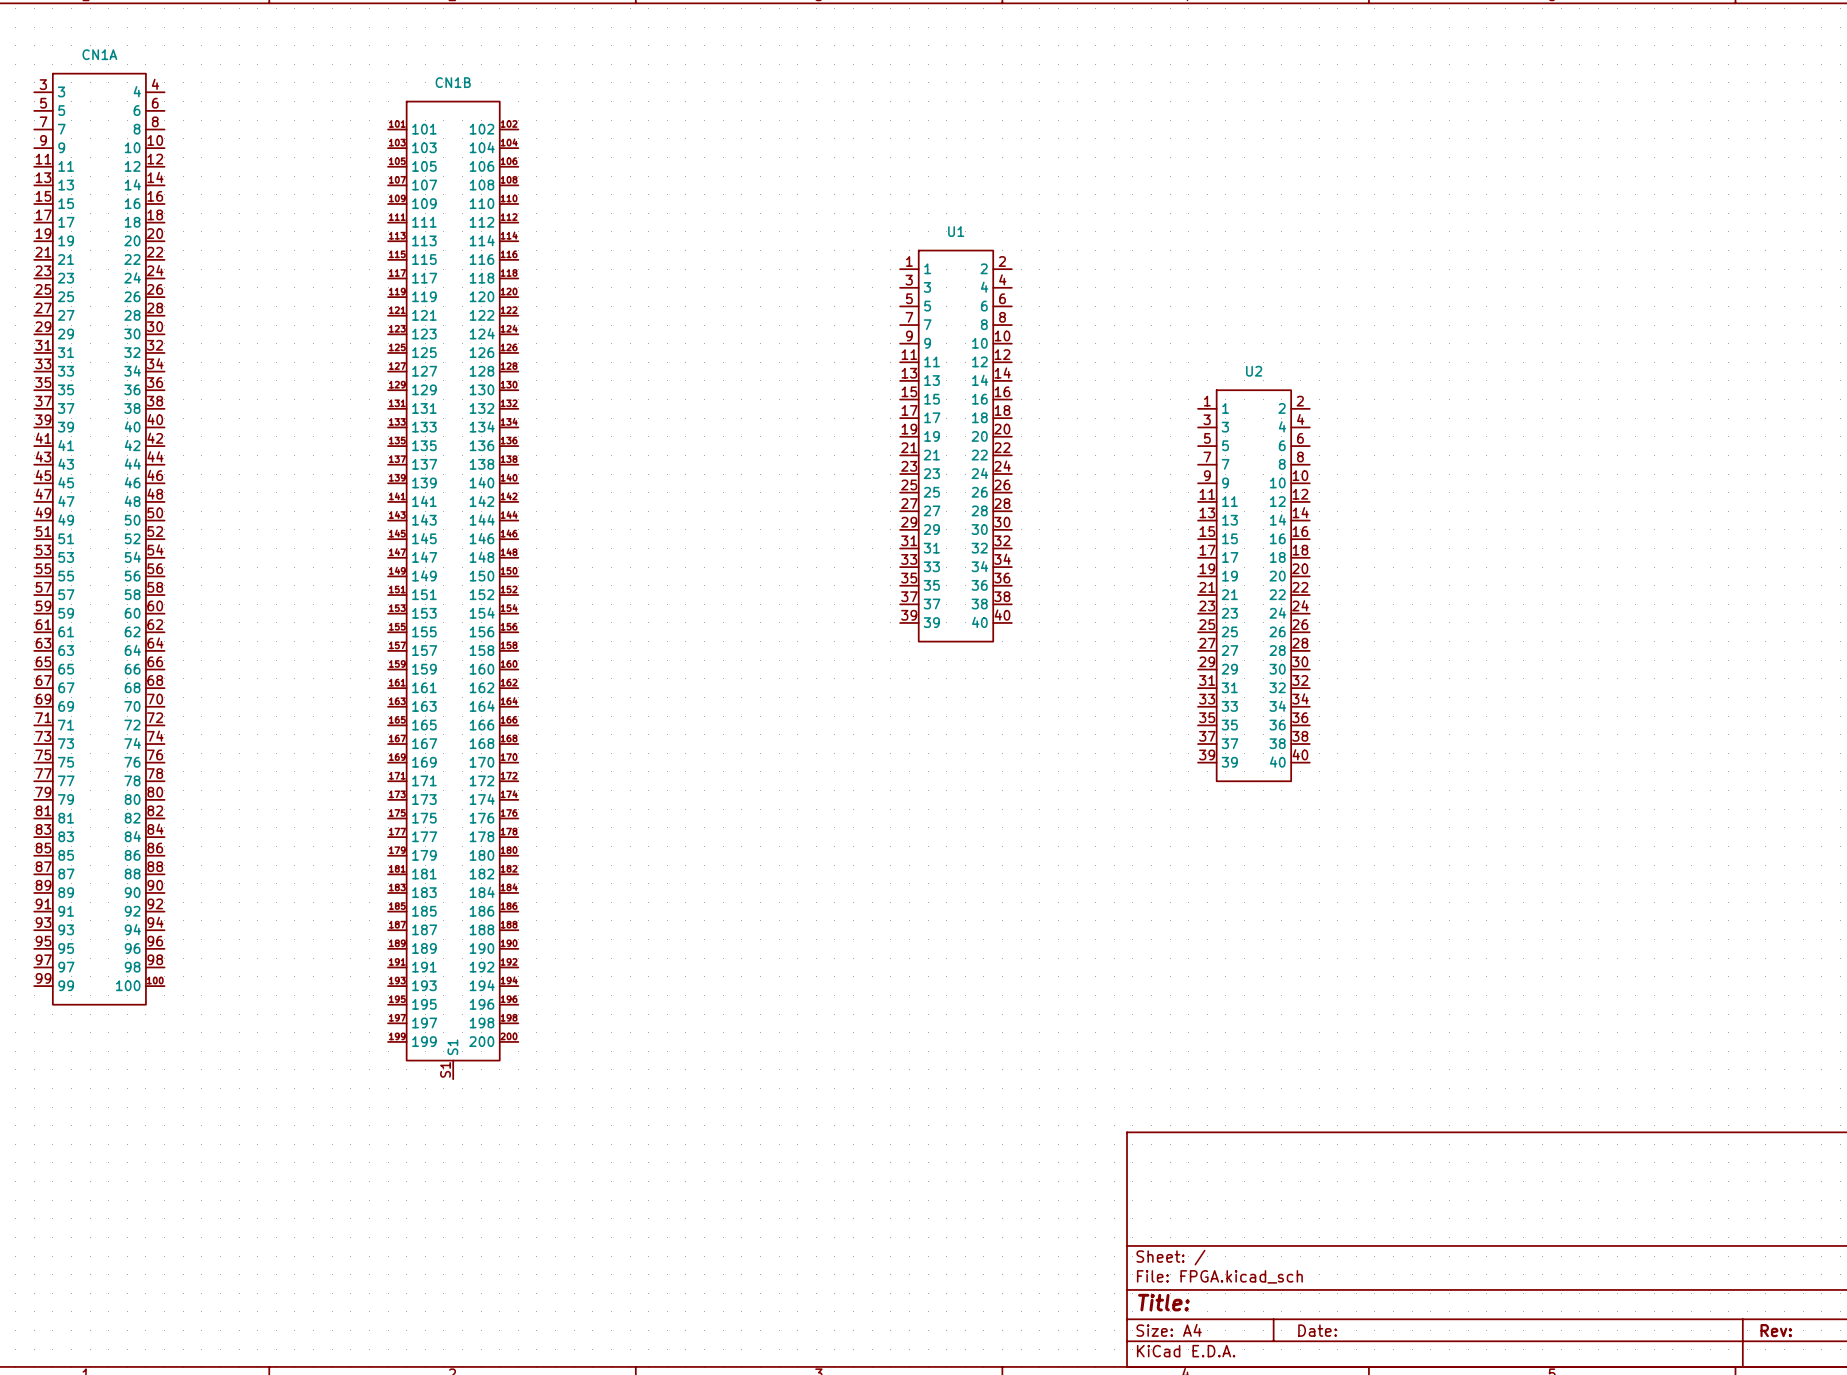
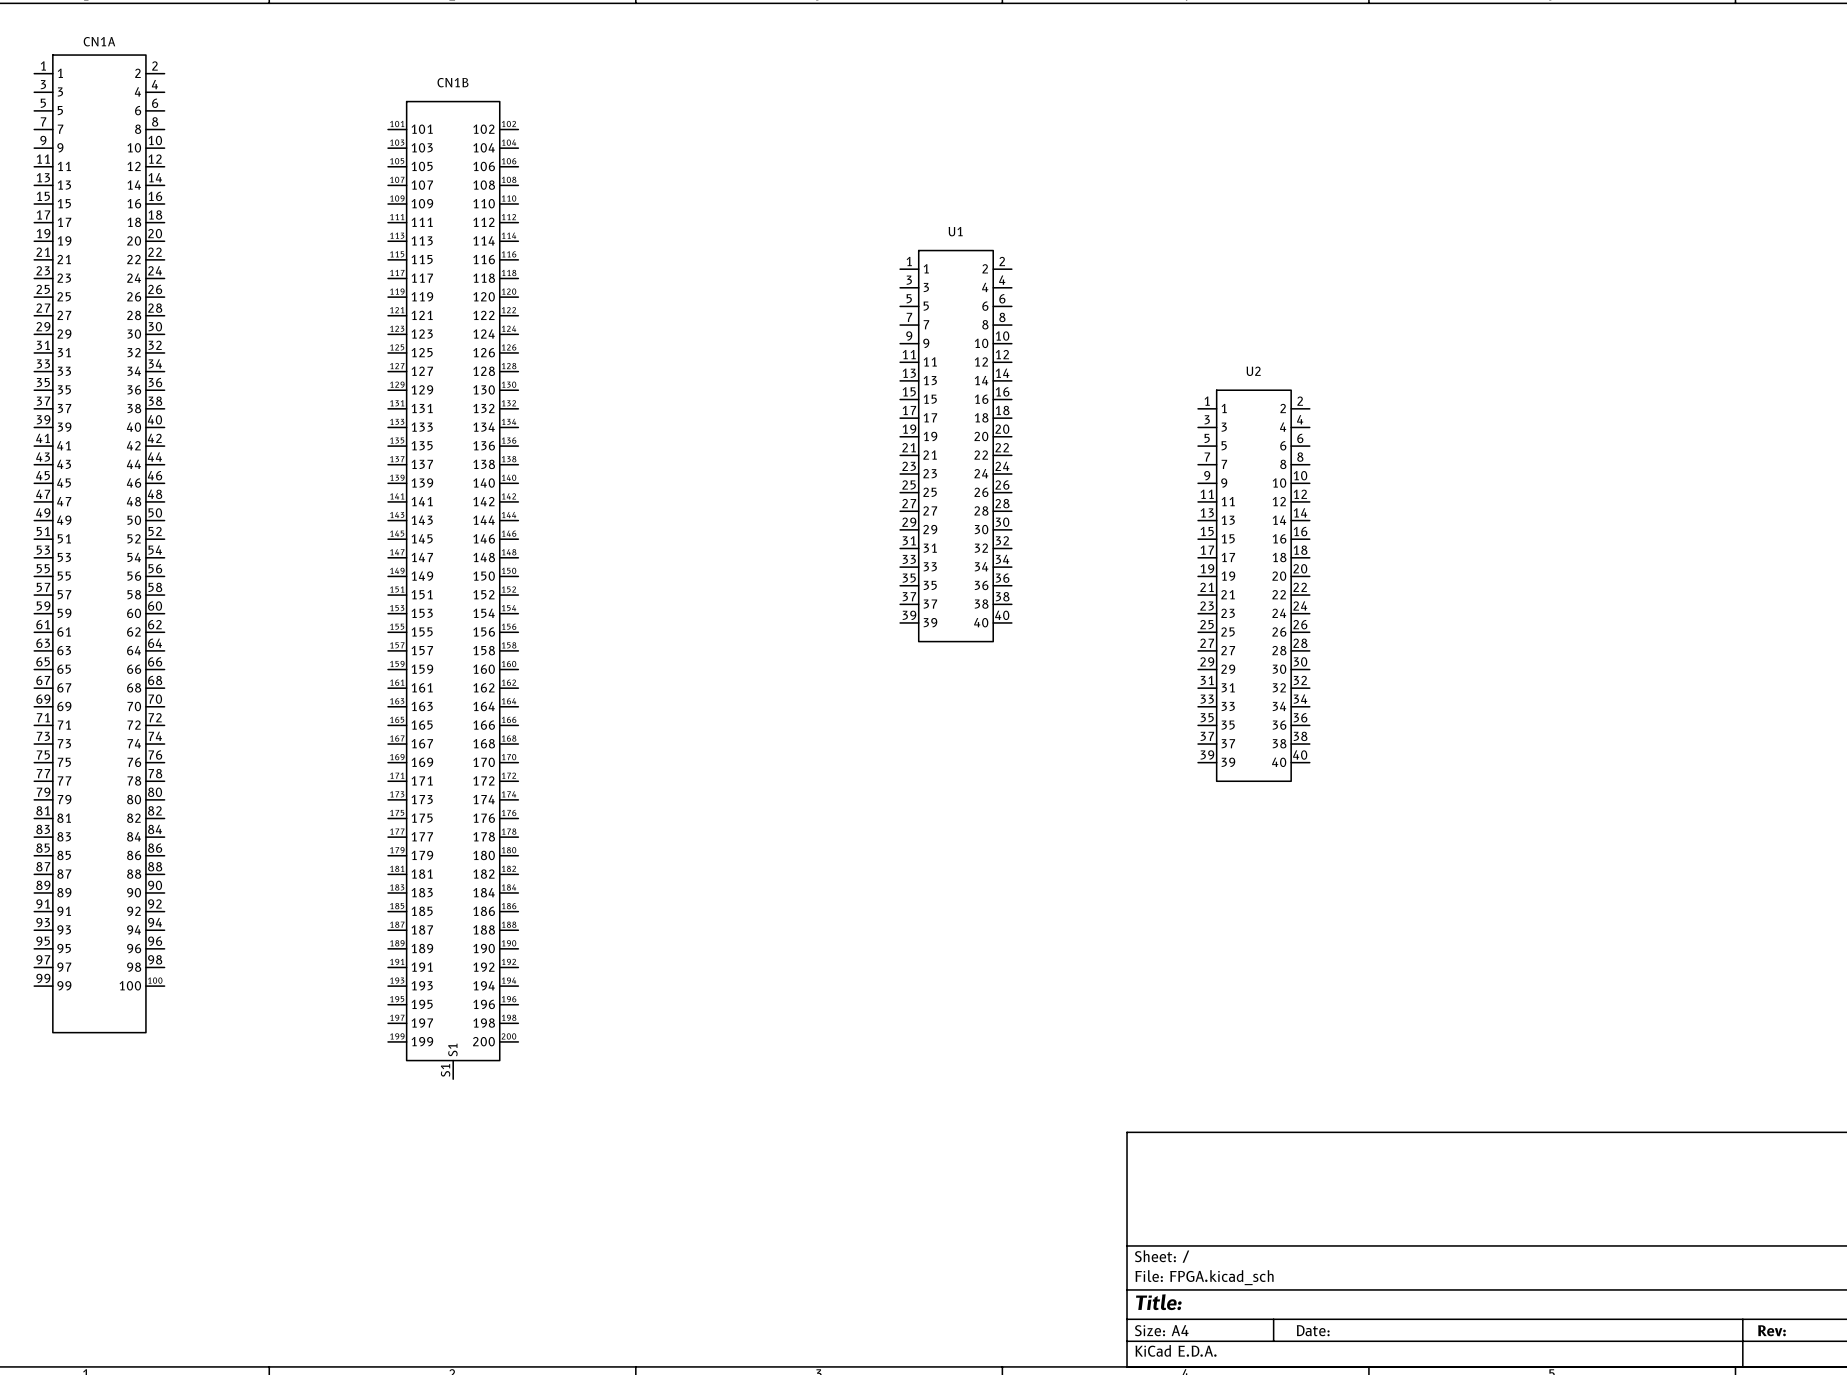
CN1A name position: CN1A (99, 54) -> CN1A (99, 41)
CN1A symbol: [34, 73, 165, 1005] -> [34, 55, 165, 1033]

